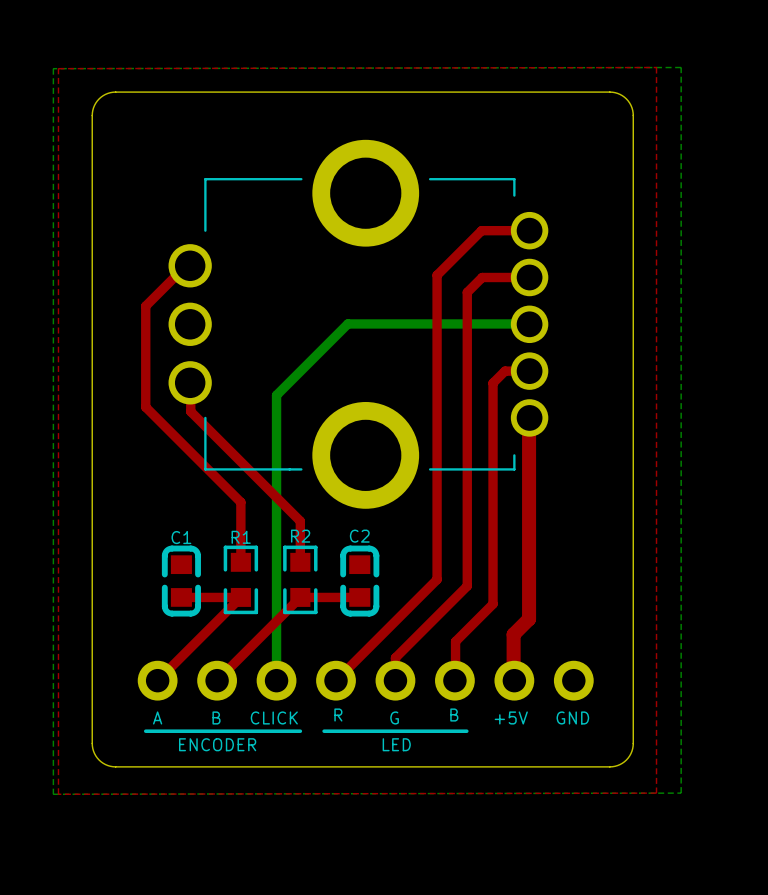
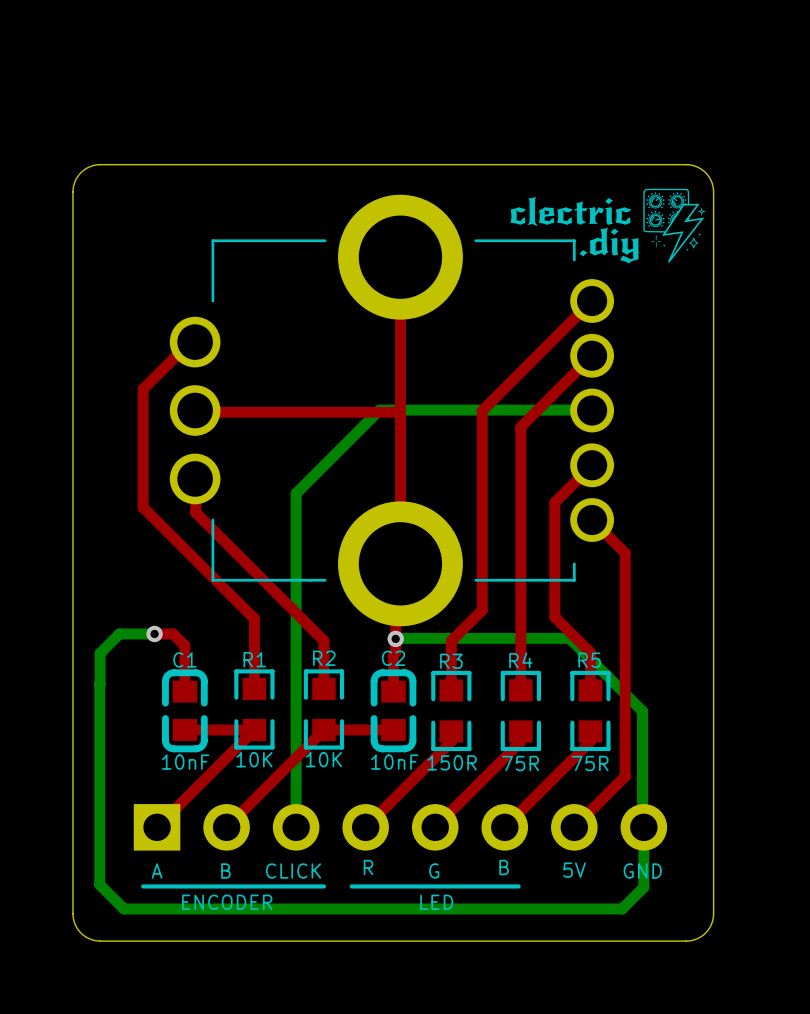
top zone outline: (656, 67) (58, 68) (58, 794) (656, 793) (656, 67) -> none
bottom zone outline: (681, 67) (53, 68) (53, 794) (681, 793) (681, 67) -> none
board edge: (115, 92) (609, 92) (620, 94) (628, 100) (633, 115) (633, 743) (630, 753) (624, 761) (609, 766) (115, 766) (105, 764) (97, 758) (92, 743) (92, 115) (94, 105) (99, 98) (105, 94) (115, 92) -> (100, 164) (88, 167) (80, 172) (75, 180) (72, 192) (72, 913) (74, 922) (78, 930) (88, 938) (100, 941) (686, 941) (695, 939) (703, 935) (710, 925) (713, 913) (713, 192) (712, 182) (707, 174) (698, 167) (686, 164) (100, 164)
drawing: none -> [510, 188, 706, 264]
top track: none -> (400, 257) (400, 563) (395, 568) (393, 691)
top track: (529, 230) (481, 230) (437, 275) (437, 579) (409, 607) -> (592, 301) (482, 410) (482, 610) (451, 641) (451, 690)
top track: (529, 277) (482, 277) (467, 292) (467, 586) (395, 657) (395, 680) -> (592, 355) (520, 426) (520, 690)
top track: none -> (195, 410) (196, 412) (400, 412)
top track: (529, 371) (505, 371) (493, 383) (493, 604) (455, 641) (455, 680) -> (592, 465) (554, 502) (554, 617) (590, 652) (590, 690)
top track: (529, 418) (529, 619) (513, 634) (513, 679) -> (591, 520) (625, 553) (625, 776) (573, 826)
top track: none -> (154, 633) (173, 633) (184, 645) (184, 691)
bottom track: none -> (154, 633) (119, 633) (100, 653) (100, 684)
via: none -> (154, 633)
bottom track: none -> (395, 638) (569, 638) (642, 711) (643, 887) (622, 908) (123, 908) (99, 884) (99, 684)
via: none -> (395, 638)
R3: none -> 150R (451, 710)
R4: none -> 75R (520, 710)
R5: none -> 75R (590, 710)
top track: none -> (520, 731) (520, 741) (435, 827)
top track: none -> (590, 731) (590, 741) (505, 826)
R1 value: none -> 10K (254, 759)
R2 value: none -> 10K (323, 759)
C1 value: none -> 10nF (185, 762)
C2 value: none -> 10nF (394, 762)
part footprint: [137, 660, 594, 701] -> [133, 804, 668, 851]
text: +5V (511, 717) -> 5V (574, 870)

